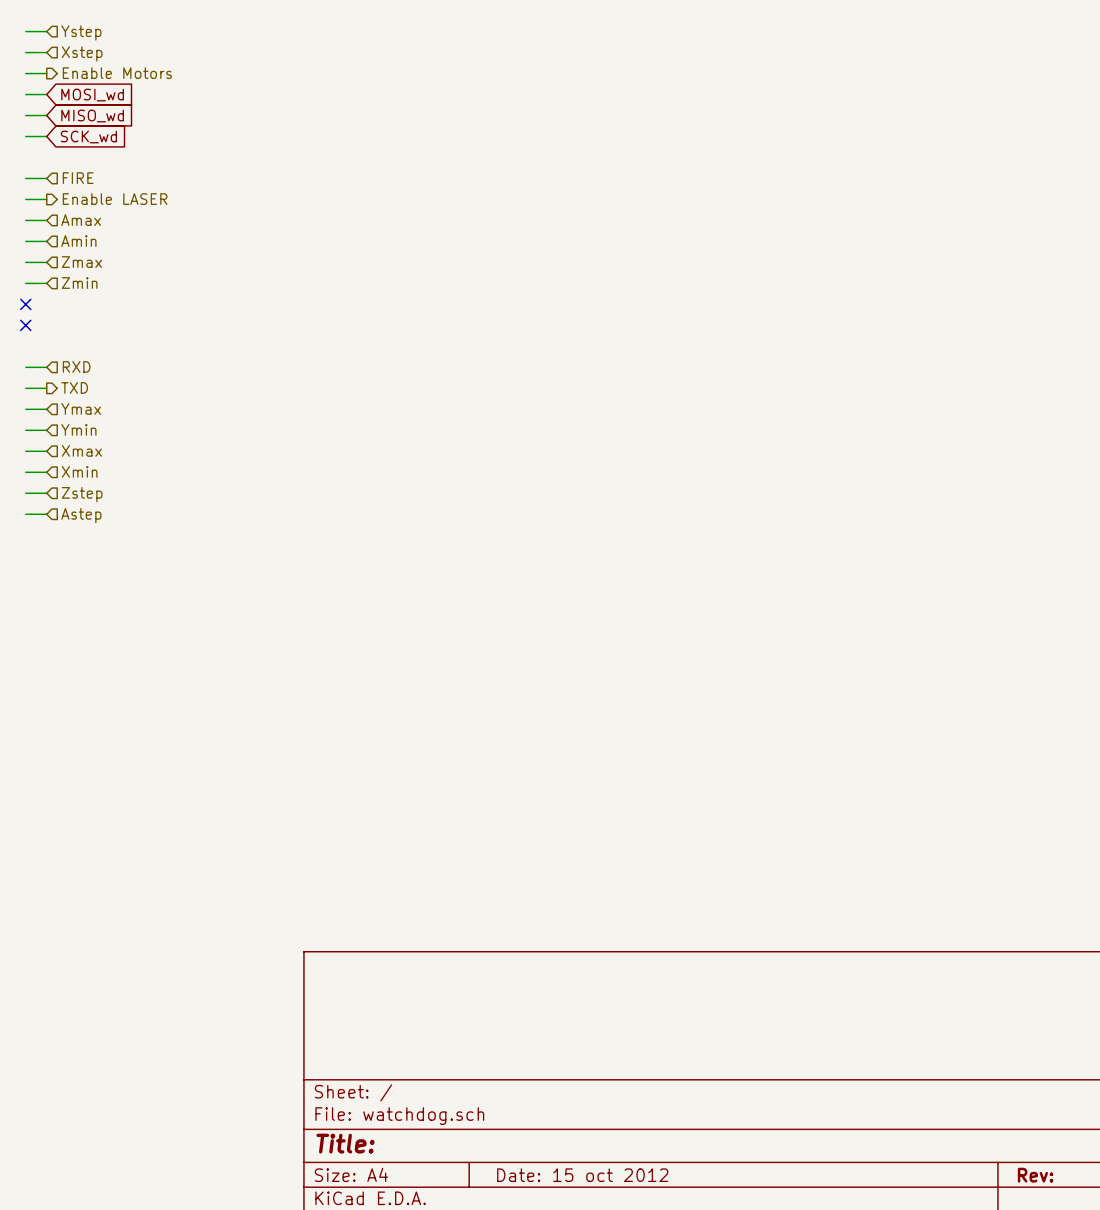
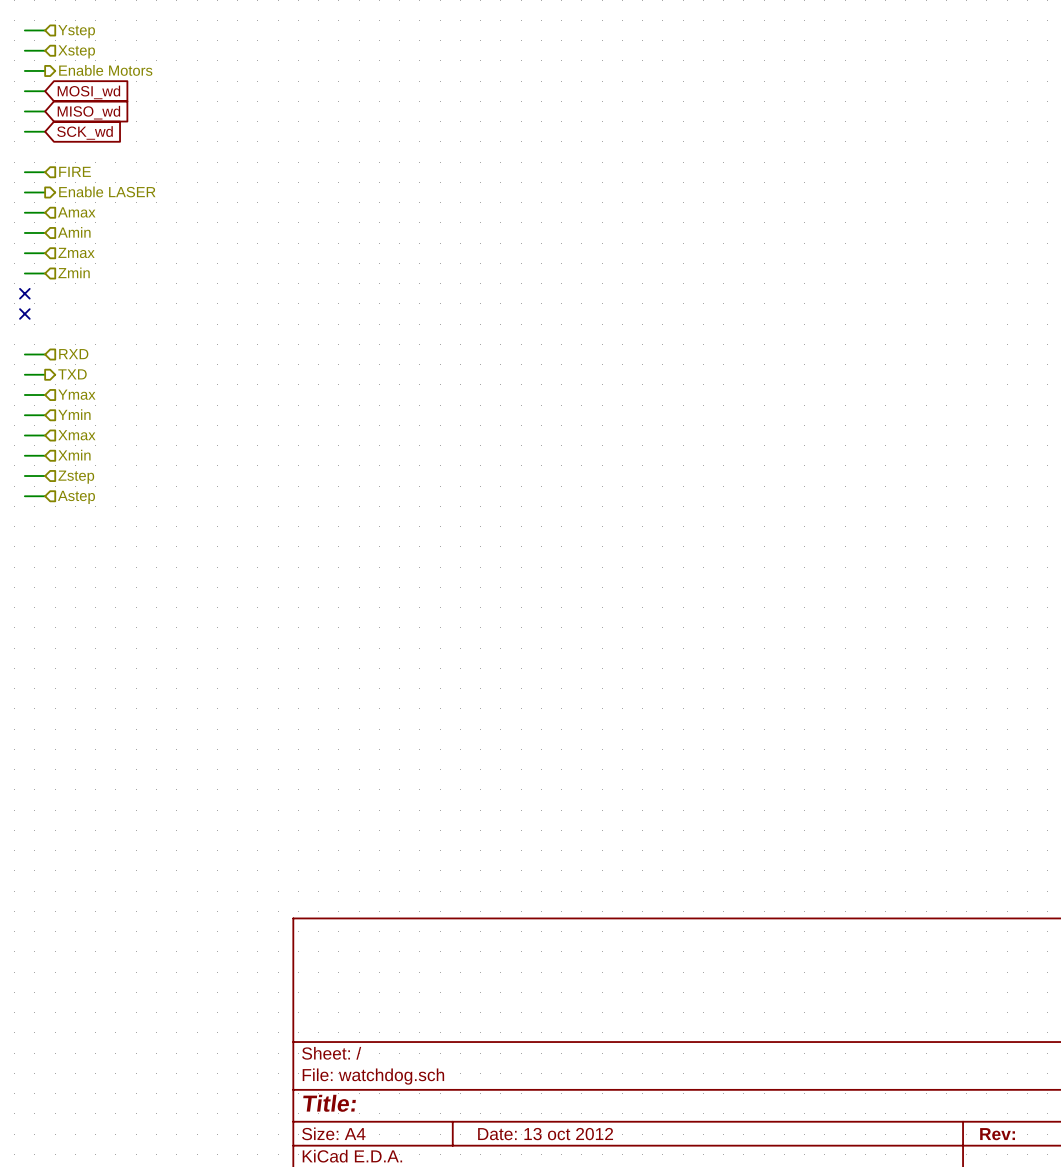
title block: Date: 15 oct 2012 (582, 1175) -> Date: 13 oct 2012 (545, 1134)

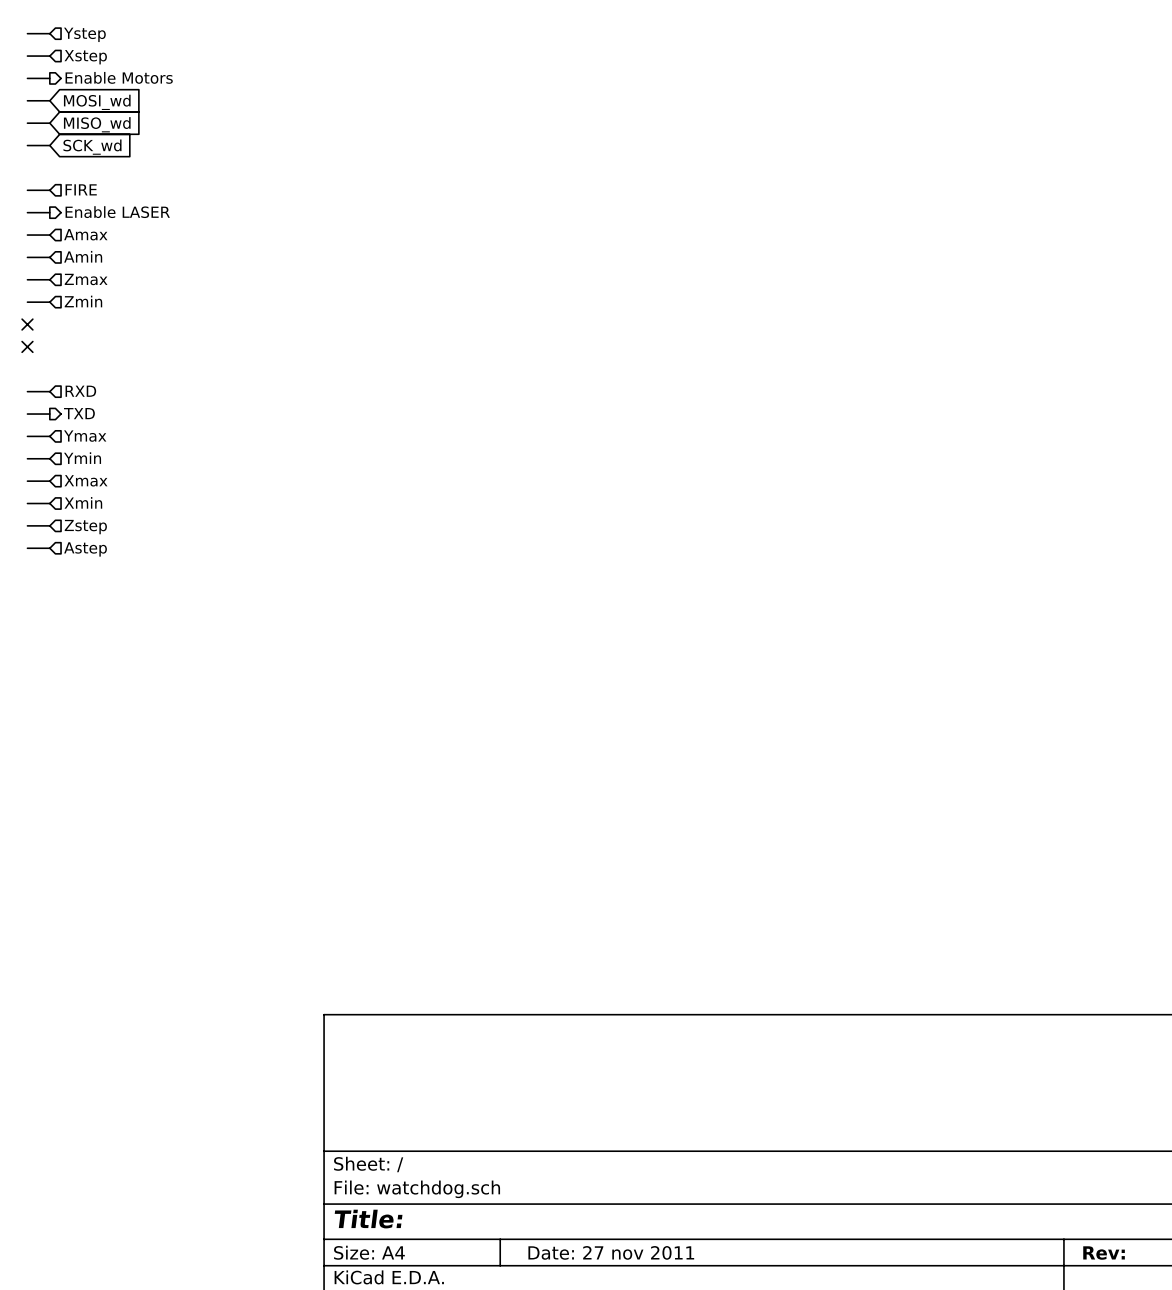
title block: Date: 13 oct 2012 (545, 1134) -> Date: 27 nov 2011 (611, 1252)

